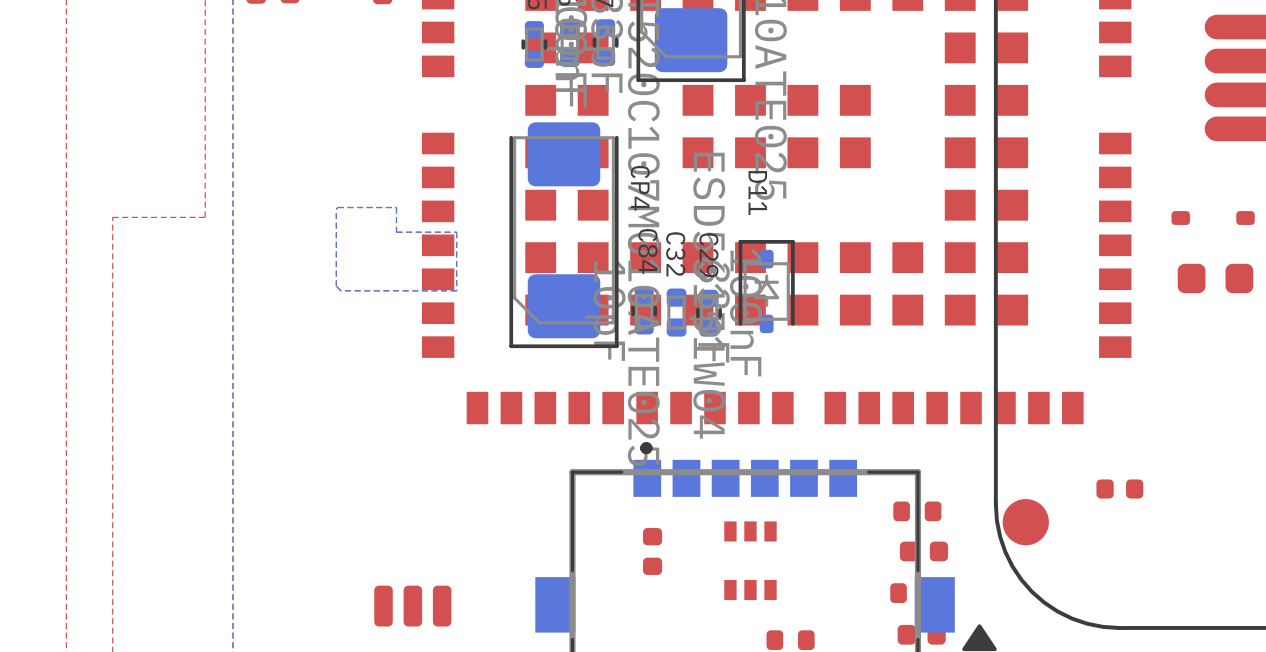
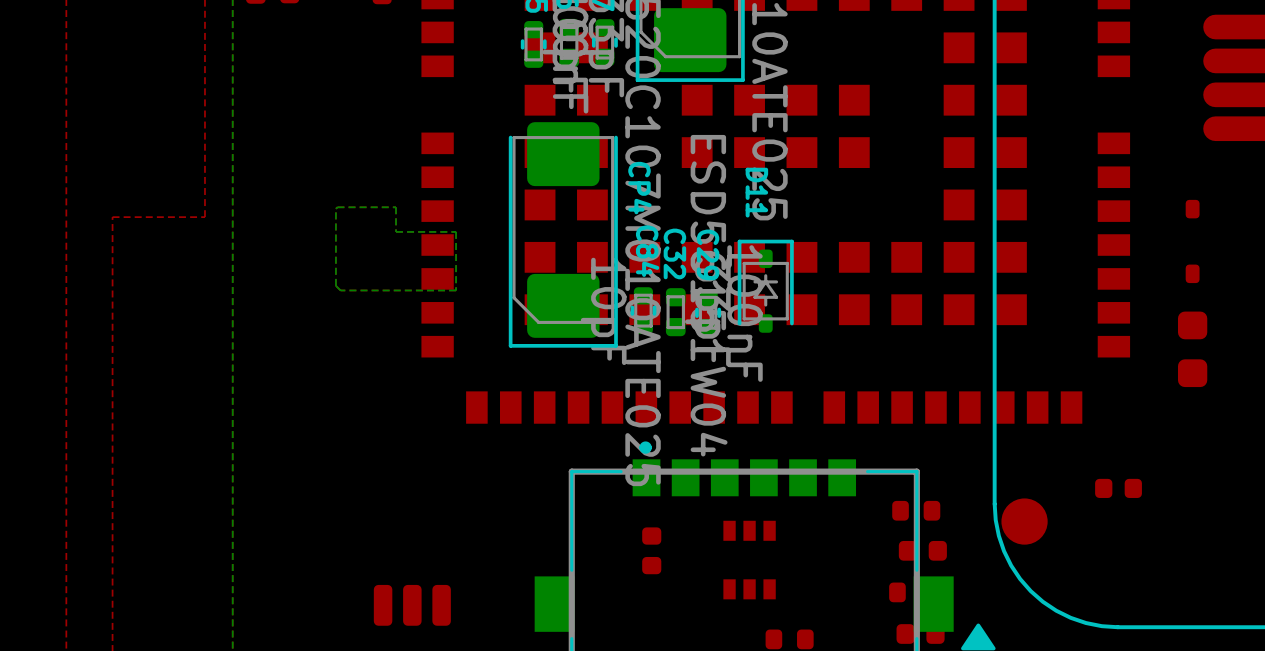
part rotation: 0° (1213, 218) -> 90° clockwise (1192, 241)
part rotation: 0° (1215, 278) -> 90° clockwise (1192, 349)
part position: (1215, 278) -> (1192, 349)

